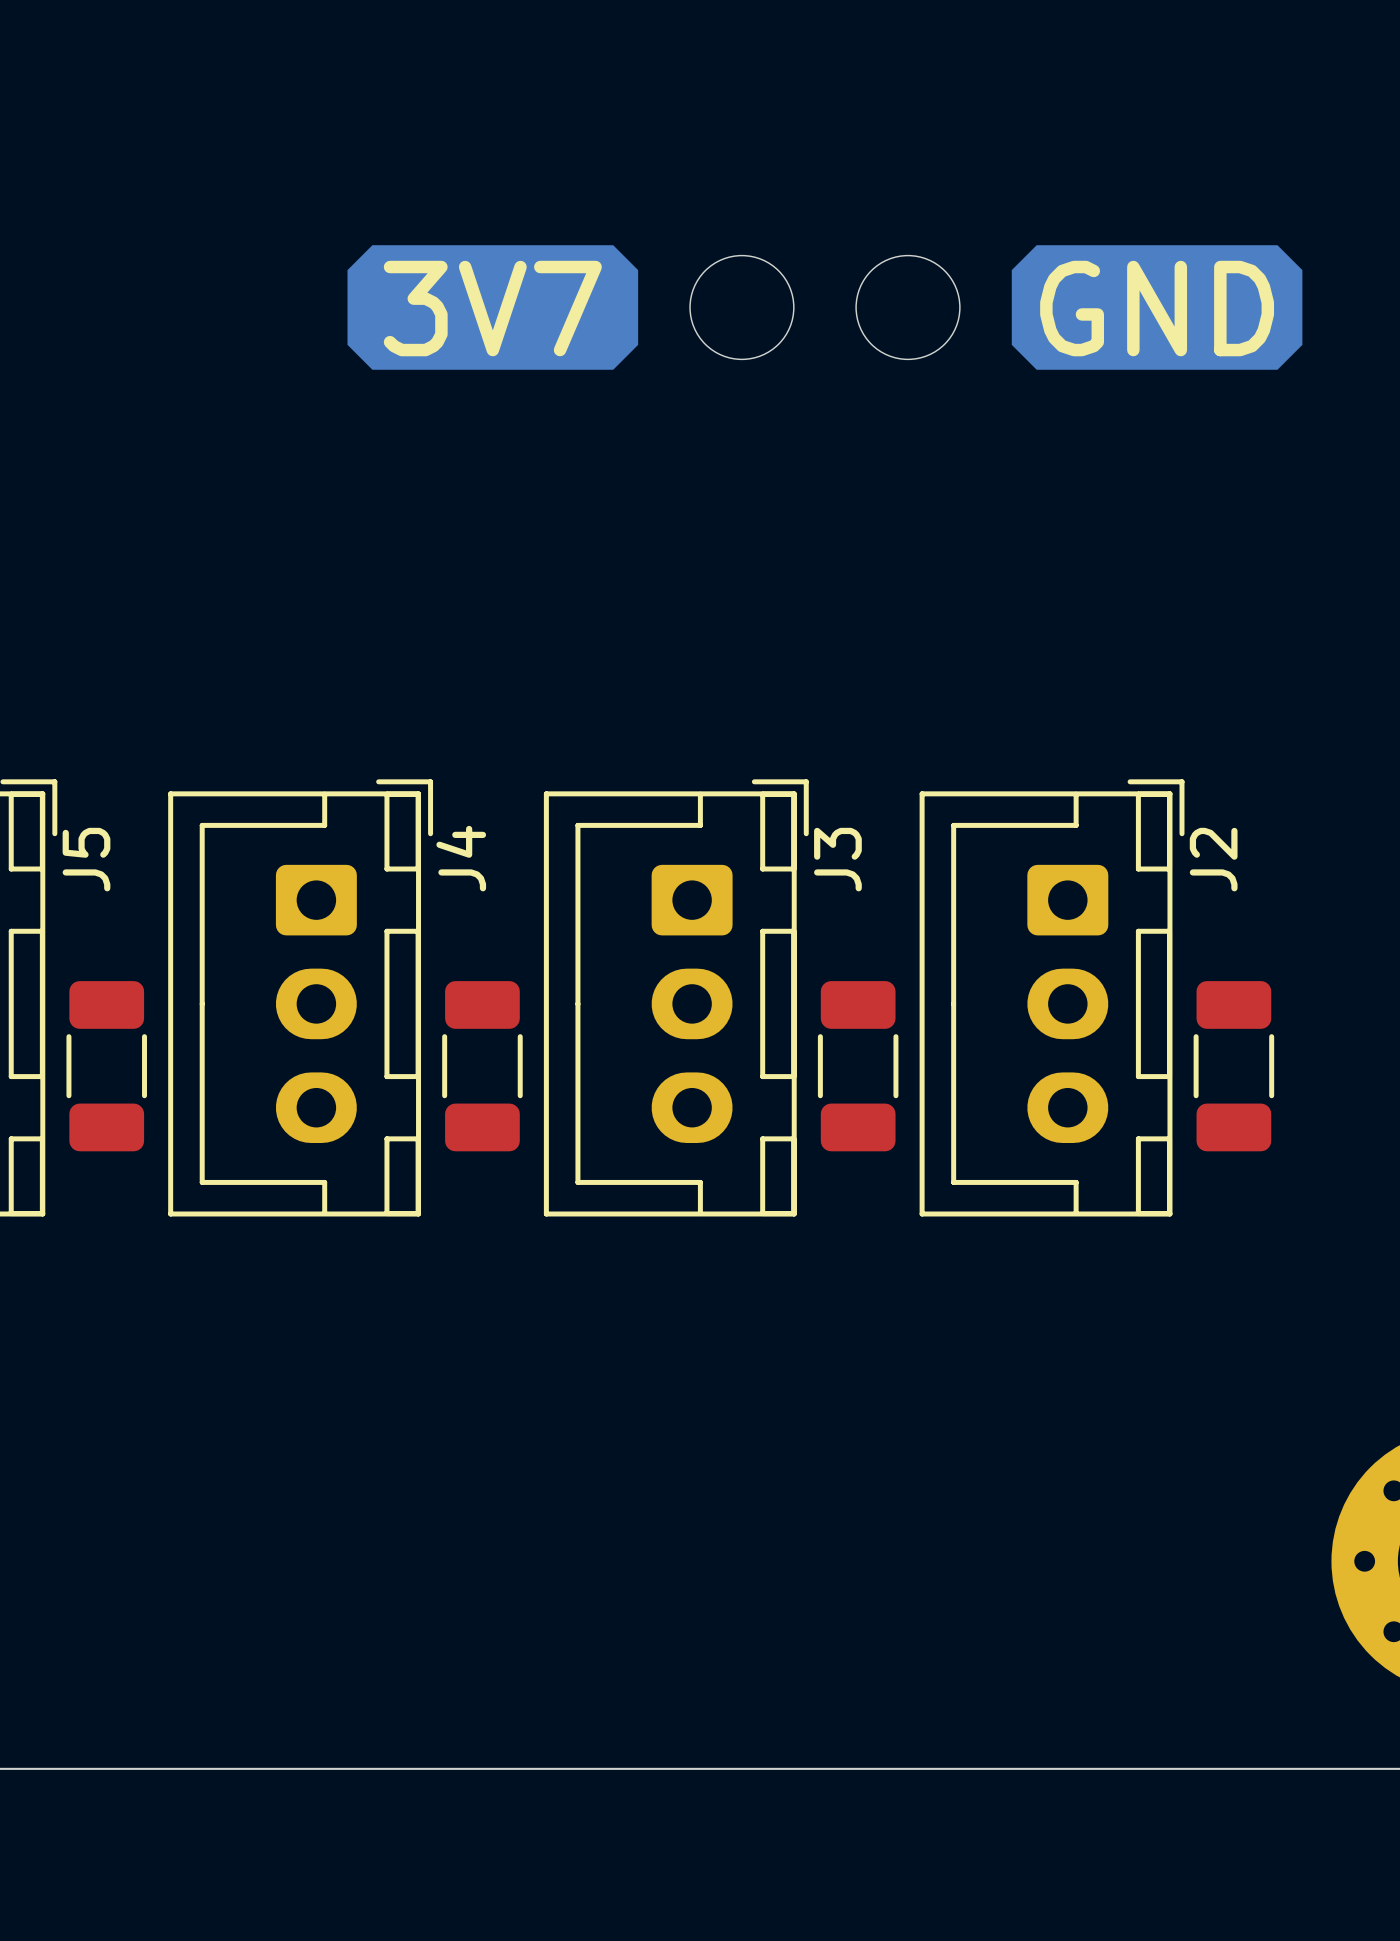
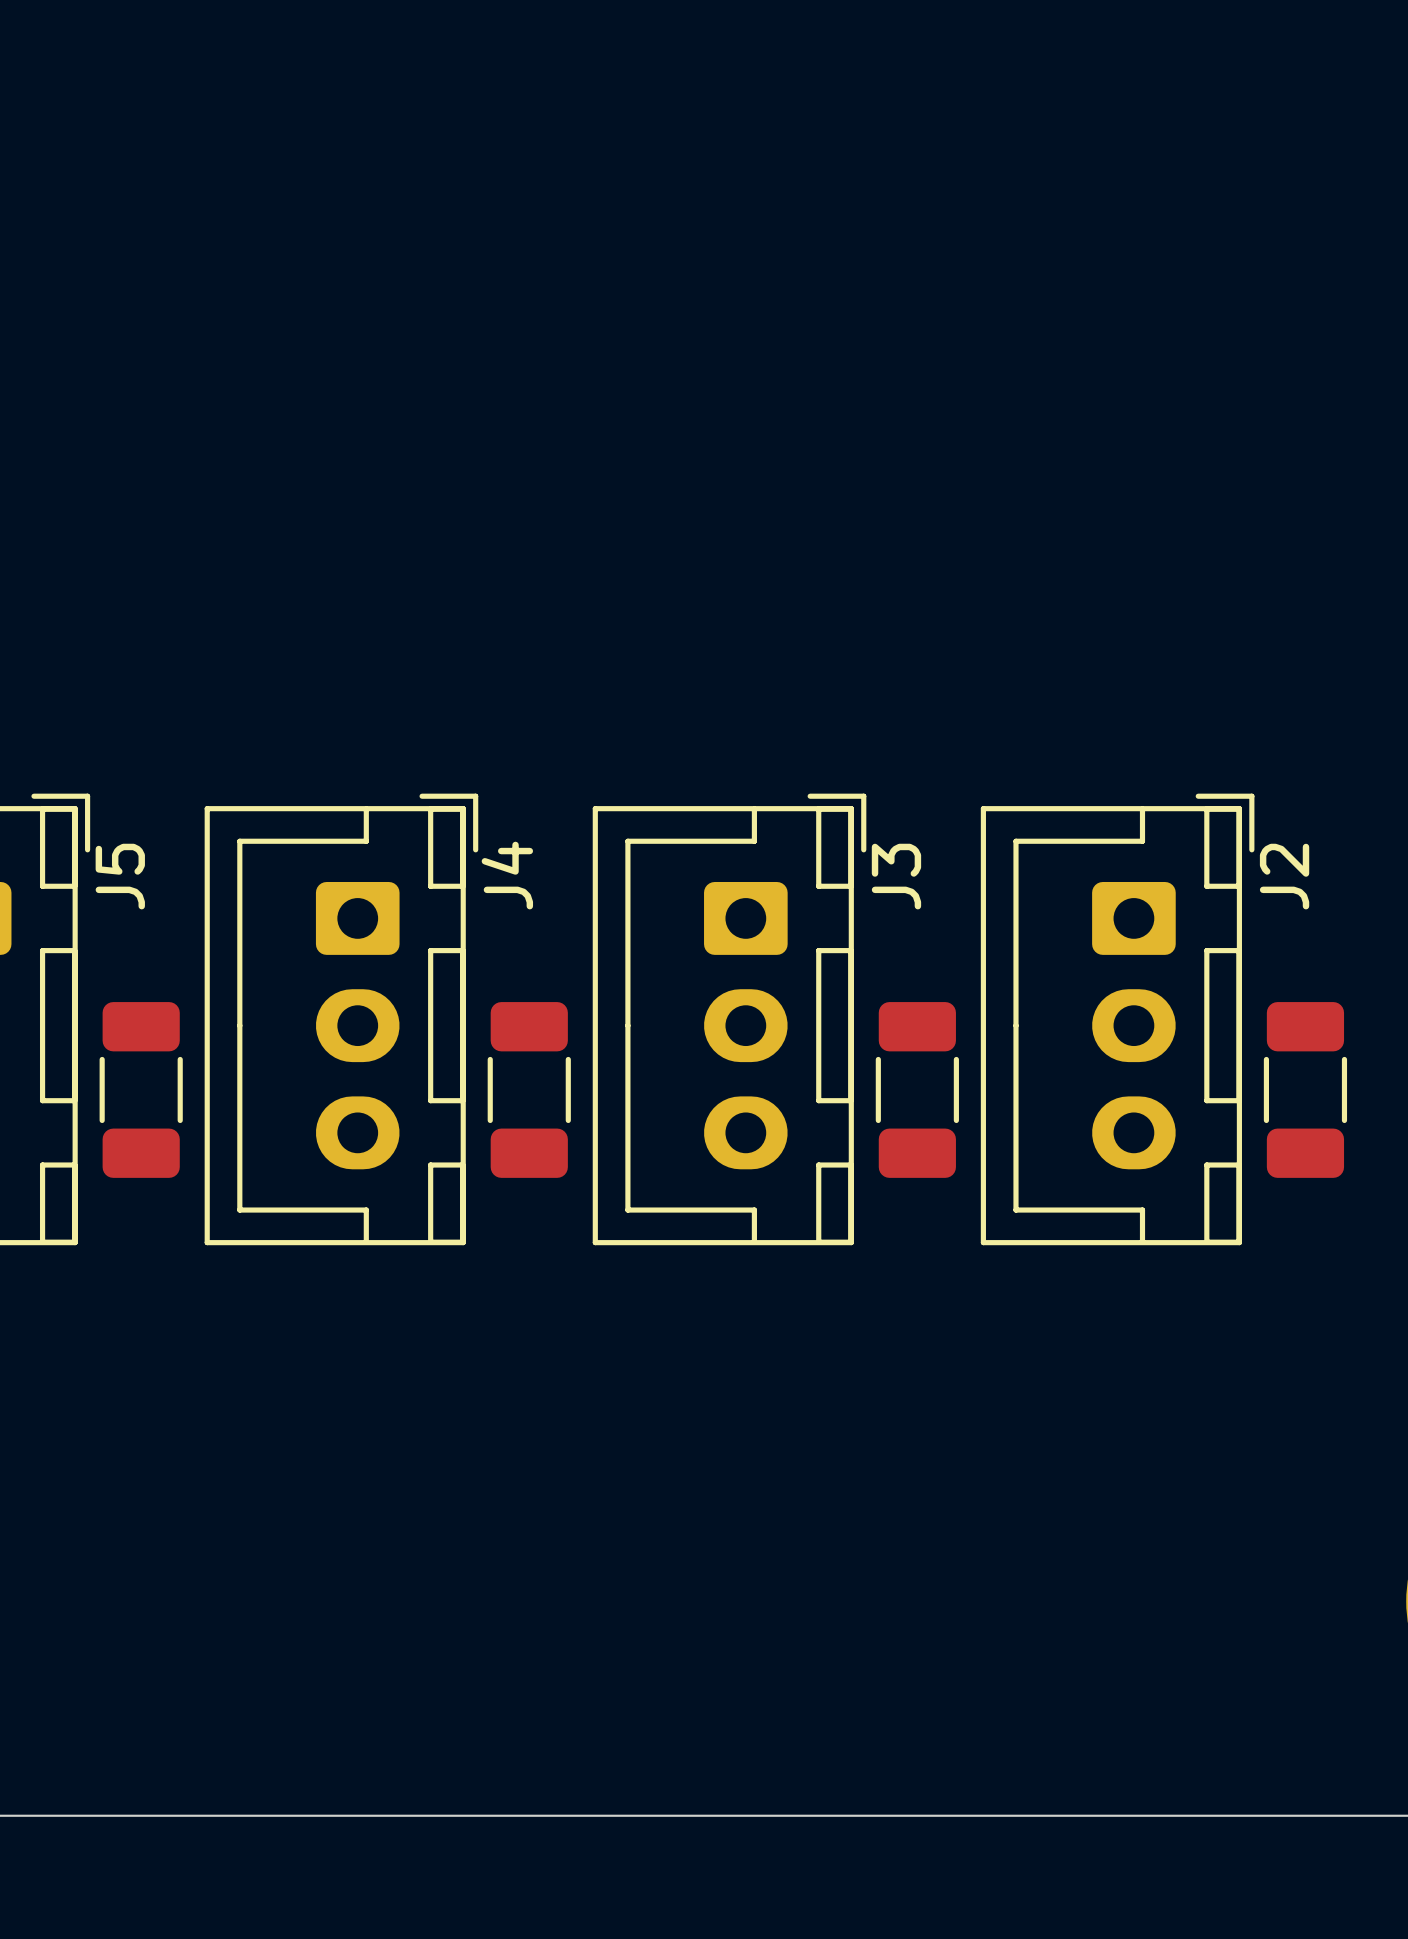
part: (824, 307) -> none

